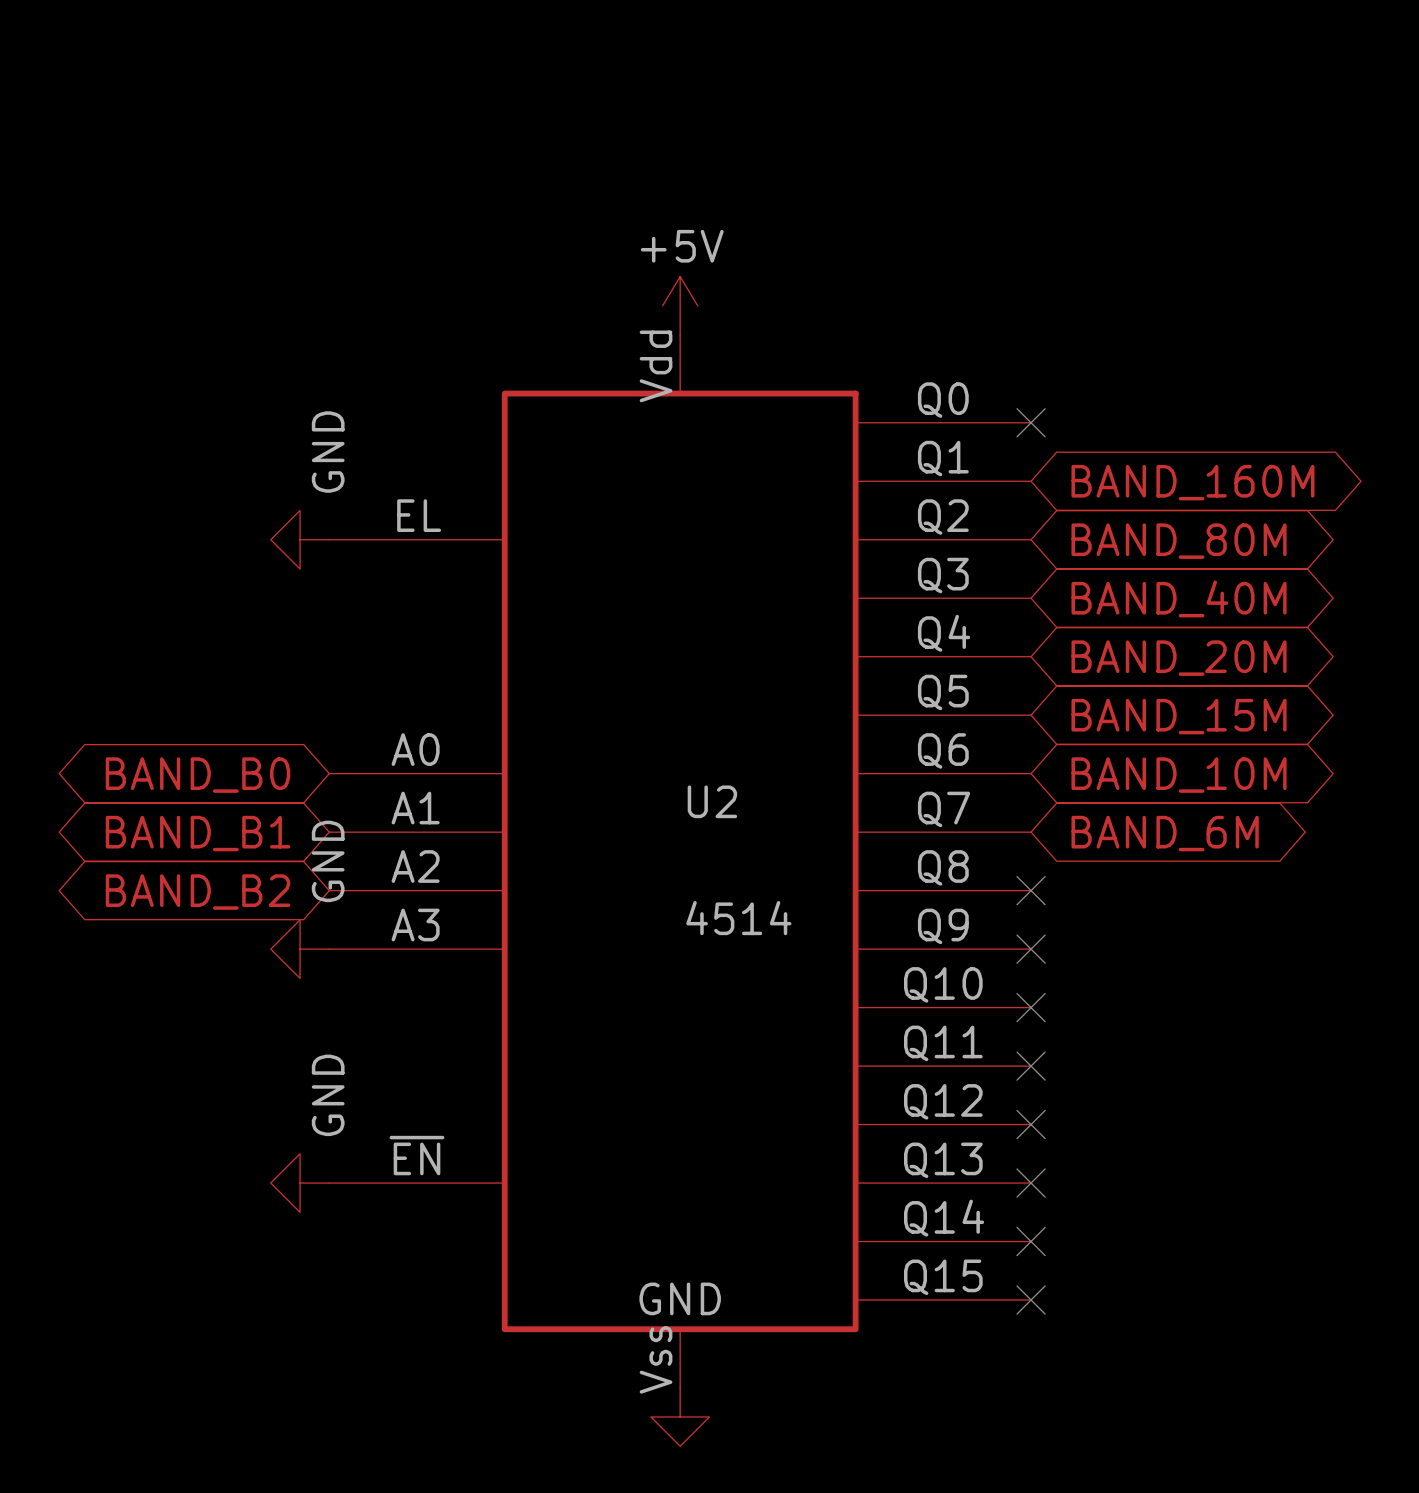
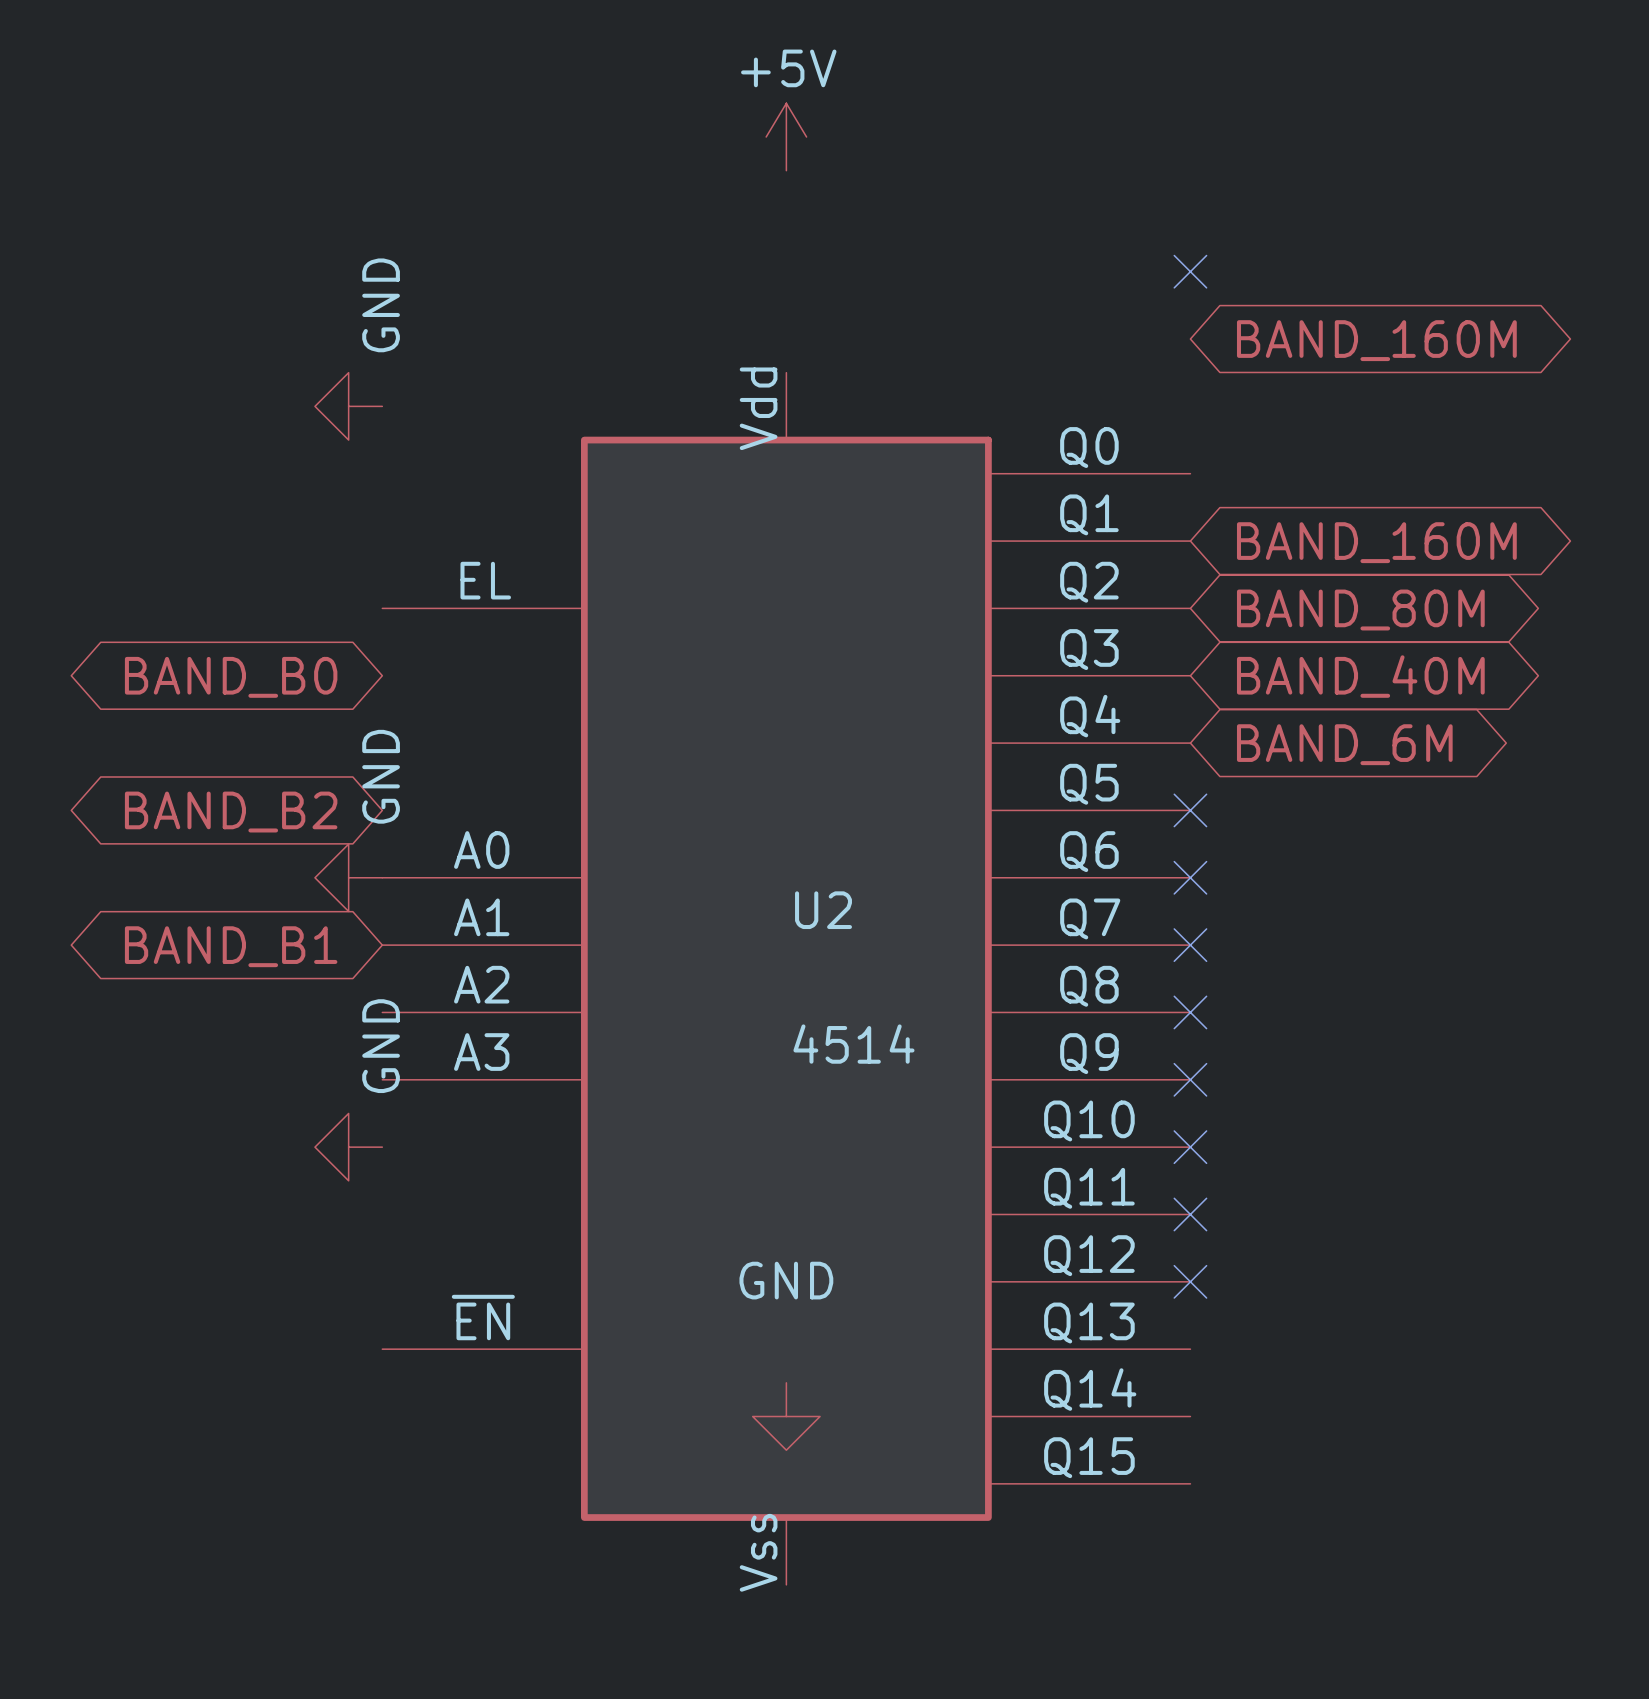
no-connect mark: none -> (1190, 271)
power symbol position: +5V (680, 305) -> +5V (786, 137)
global label: none -> BAND_160M (1376, 340)
power symbol: none -> GND (348, 406)
no-connect mark: (1031, 422) -> none
power symbol: GND (300, 539) -> none
global label: BAND_20M (1179, 658) -> BAND_6M (1344, 744)
no-connect mark: none -> (1190, 810)
global label: BAND_15M (1179, 716) -> none
power symbol: none -> GND (348, 877)
no-connect mark: none -> (1190, 877)
global label position: BAND_B0 (198, 775) -> BAND_B0 (231, 677)
global label: BAND_10M (1179, 775) -> none
no-connect mark: none -> (1190, 945)
global label: BAND_6M (1165, 833) -> none
global label position: BAND_B2 (198, 892) -> BAND_B2 (231, 812)
power symbol position: GND (300, 949) -> GND (348, 1147)
power symbol: GND (300, 1183) -> none
no-connect mark: (1031, 1183) -> none
no-connect mark: (1031, 1241) -> none
no-connect mark: (1031, 1300) -> none
power symbol position: GND (680, 1416) -> GND (786, 1416)

